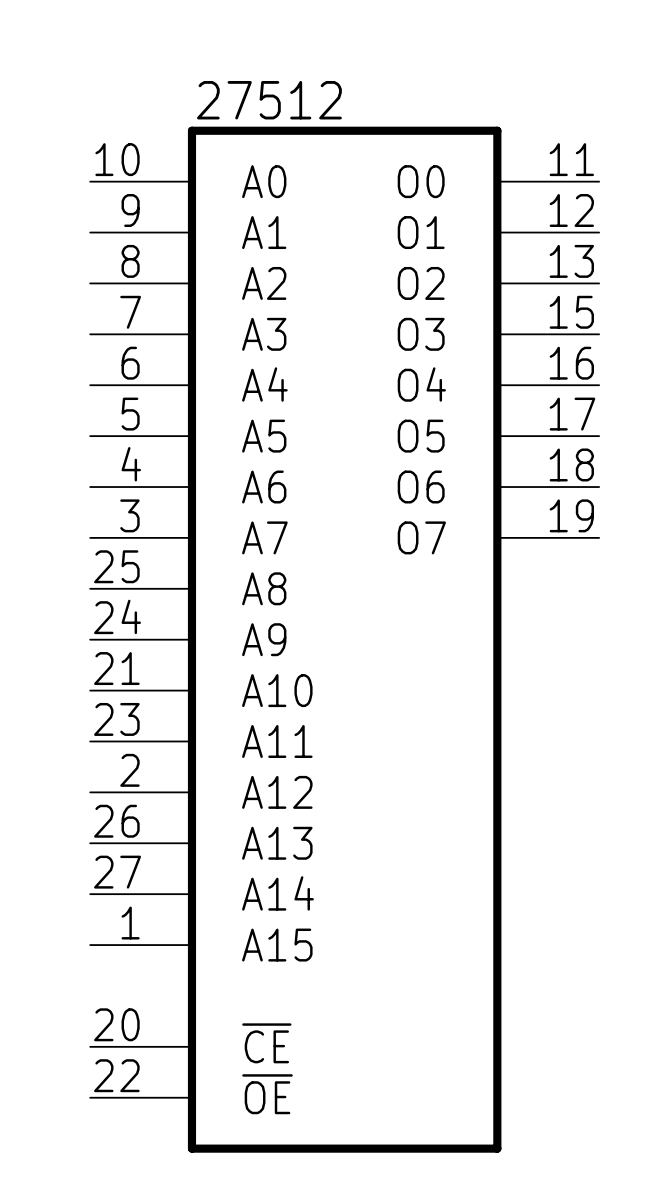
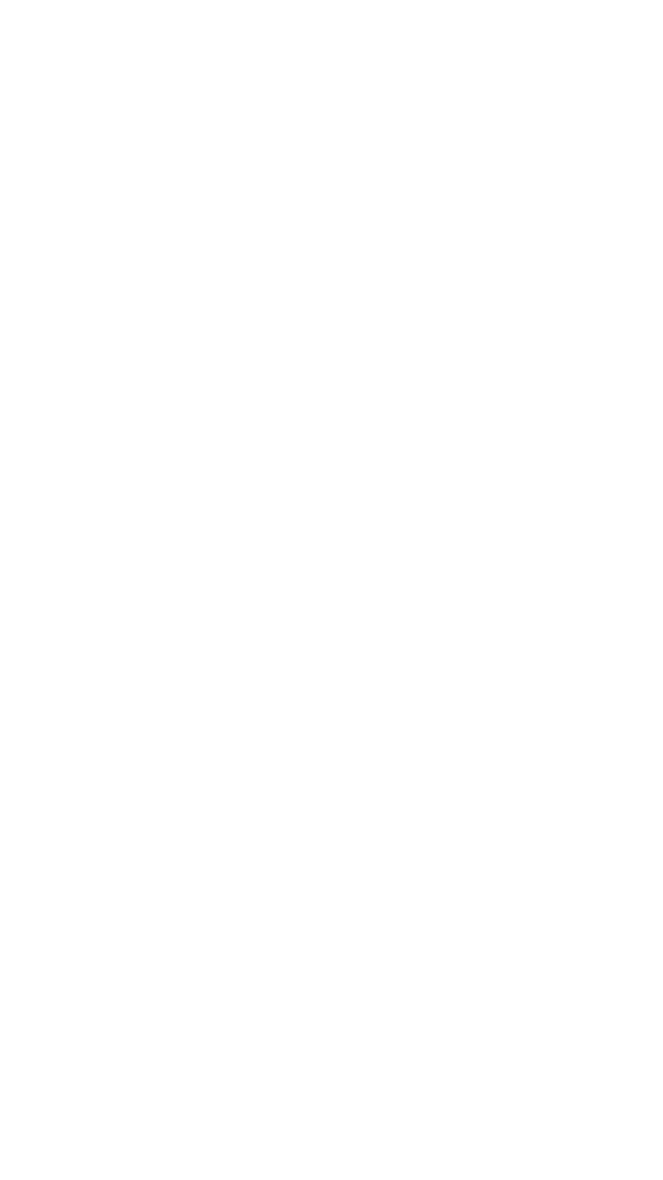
27512: (344, 639) -> none

